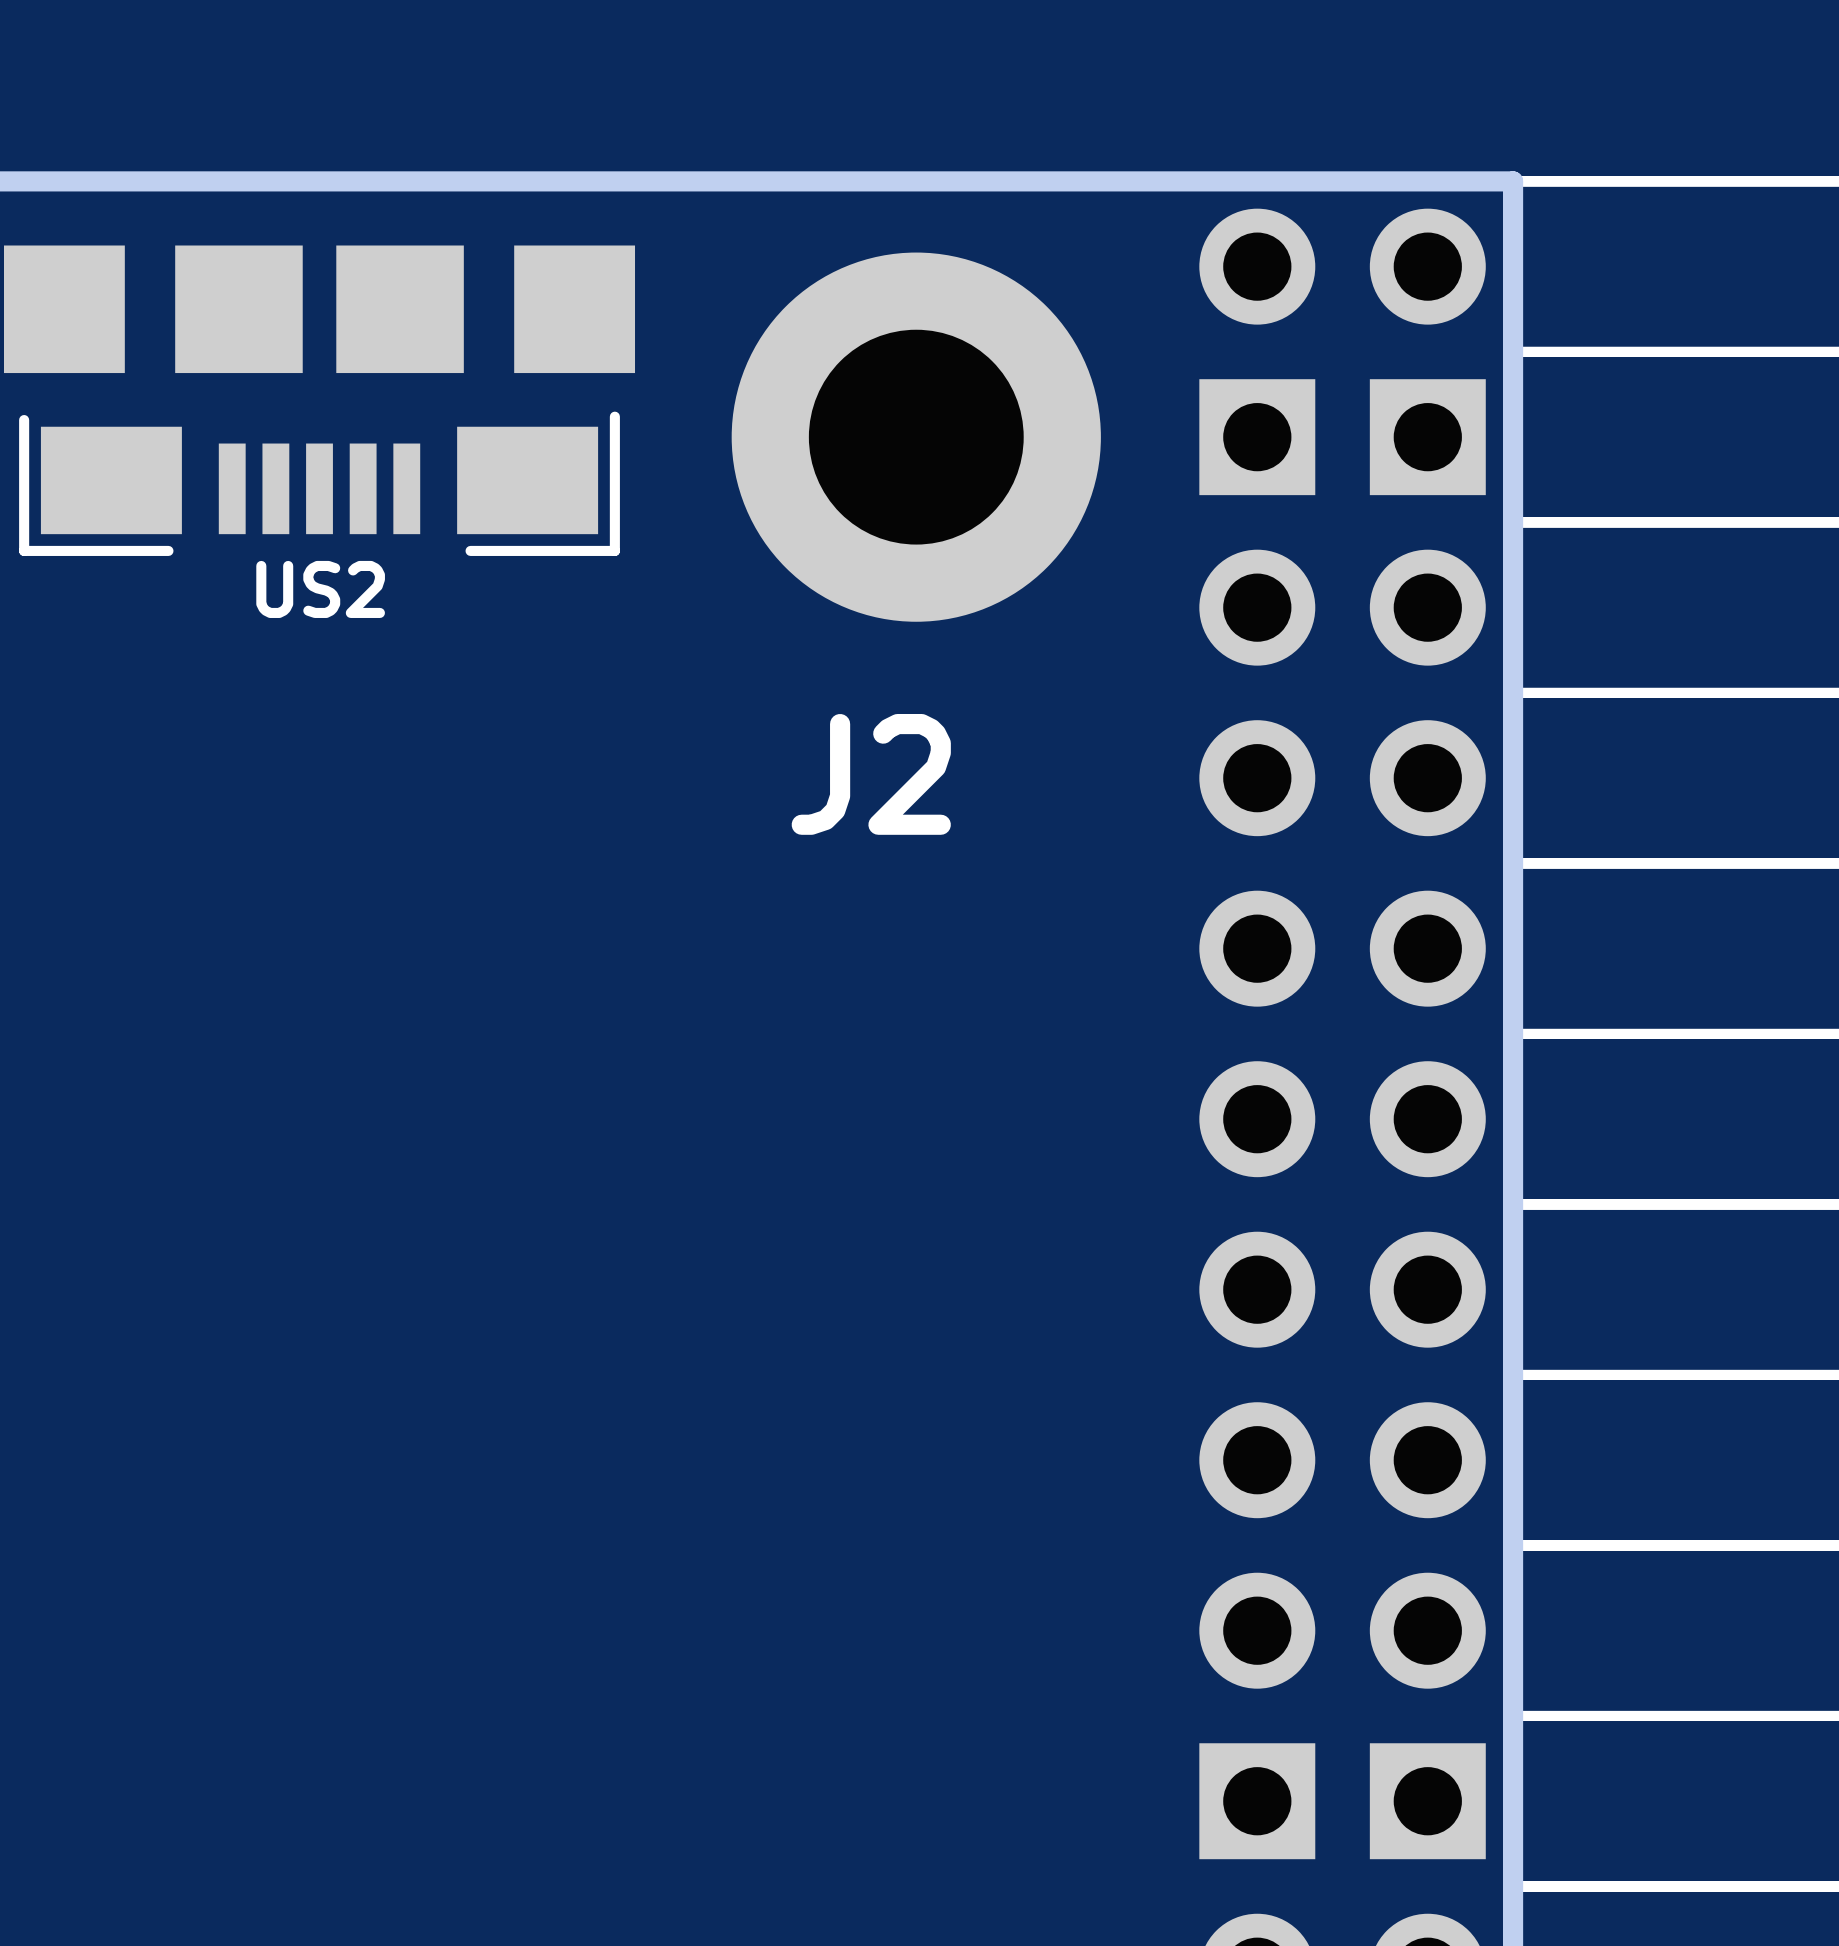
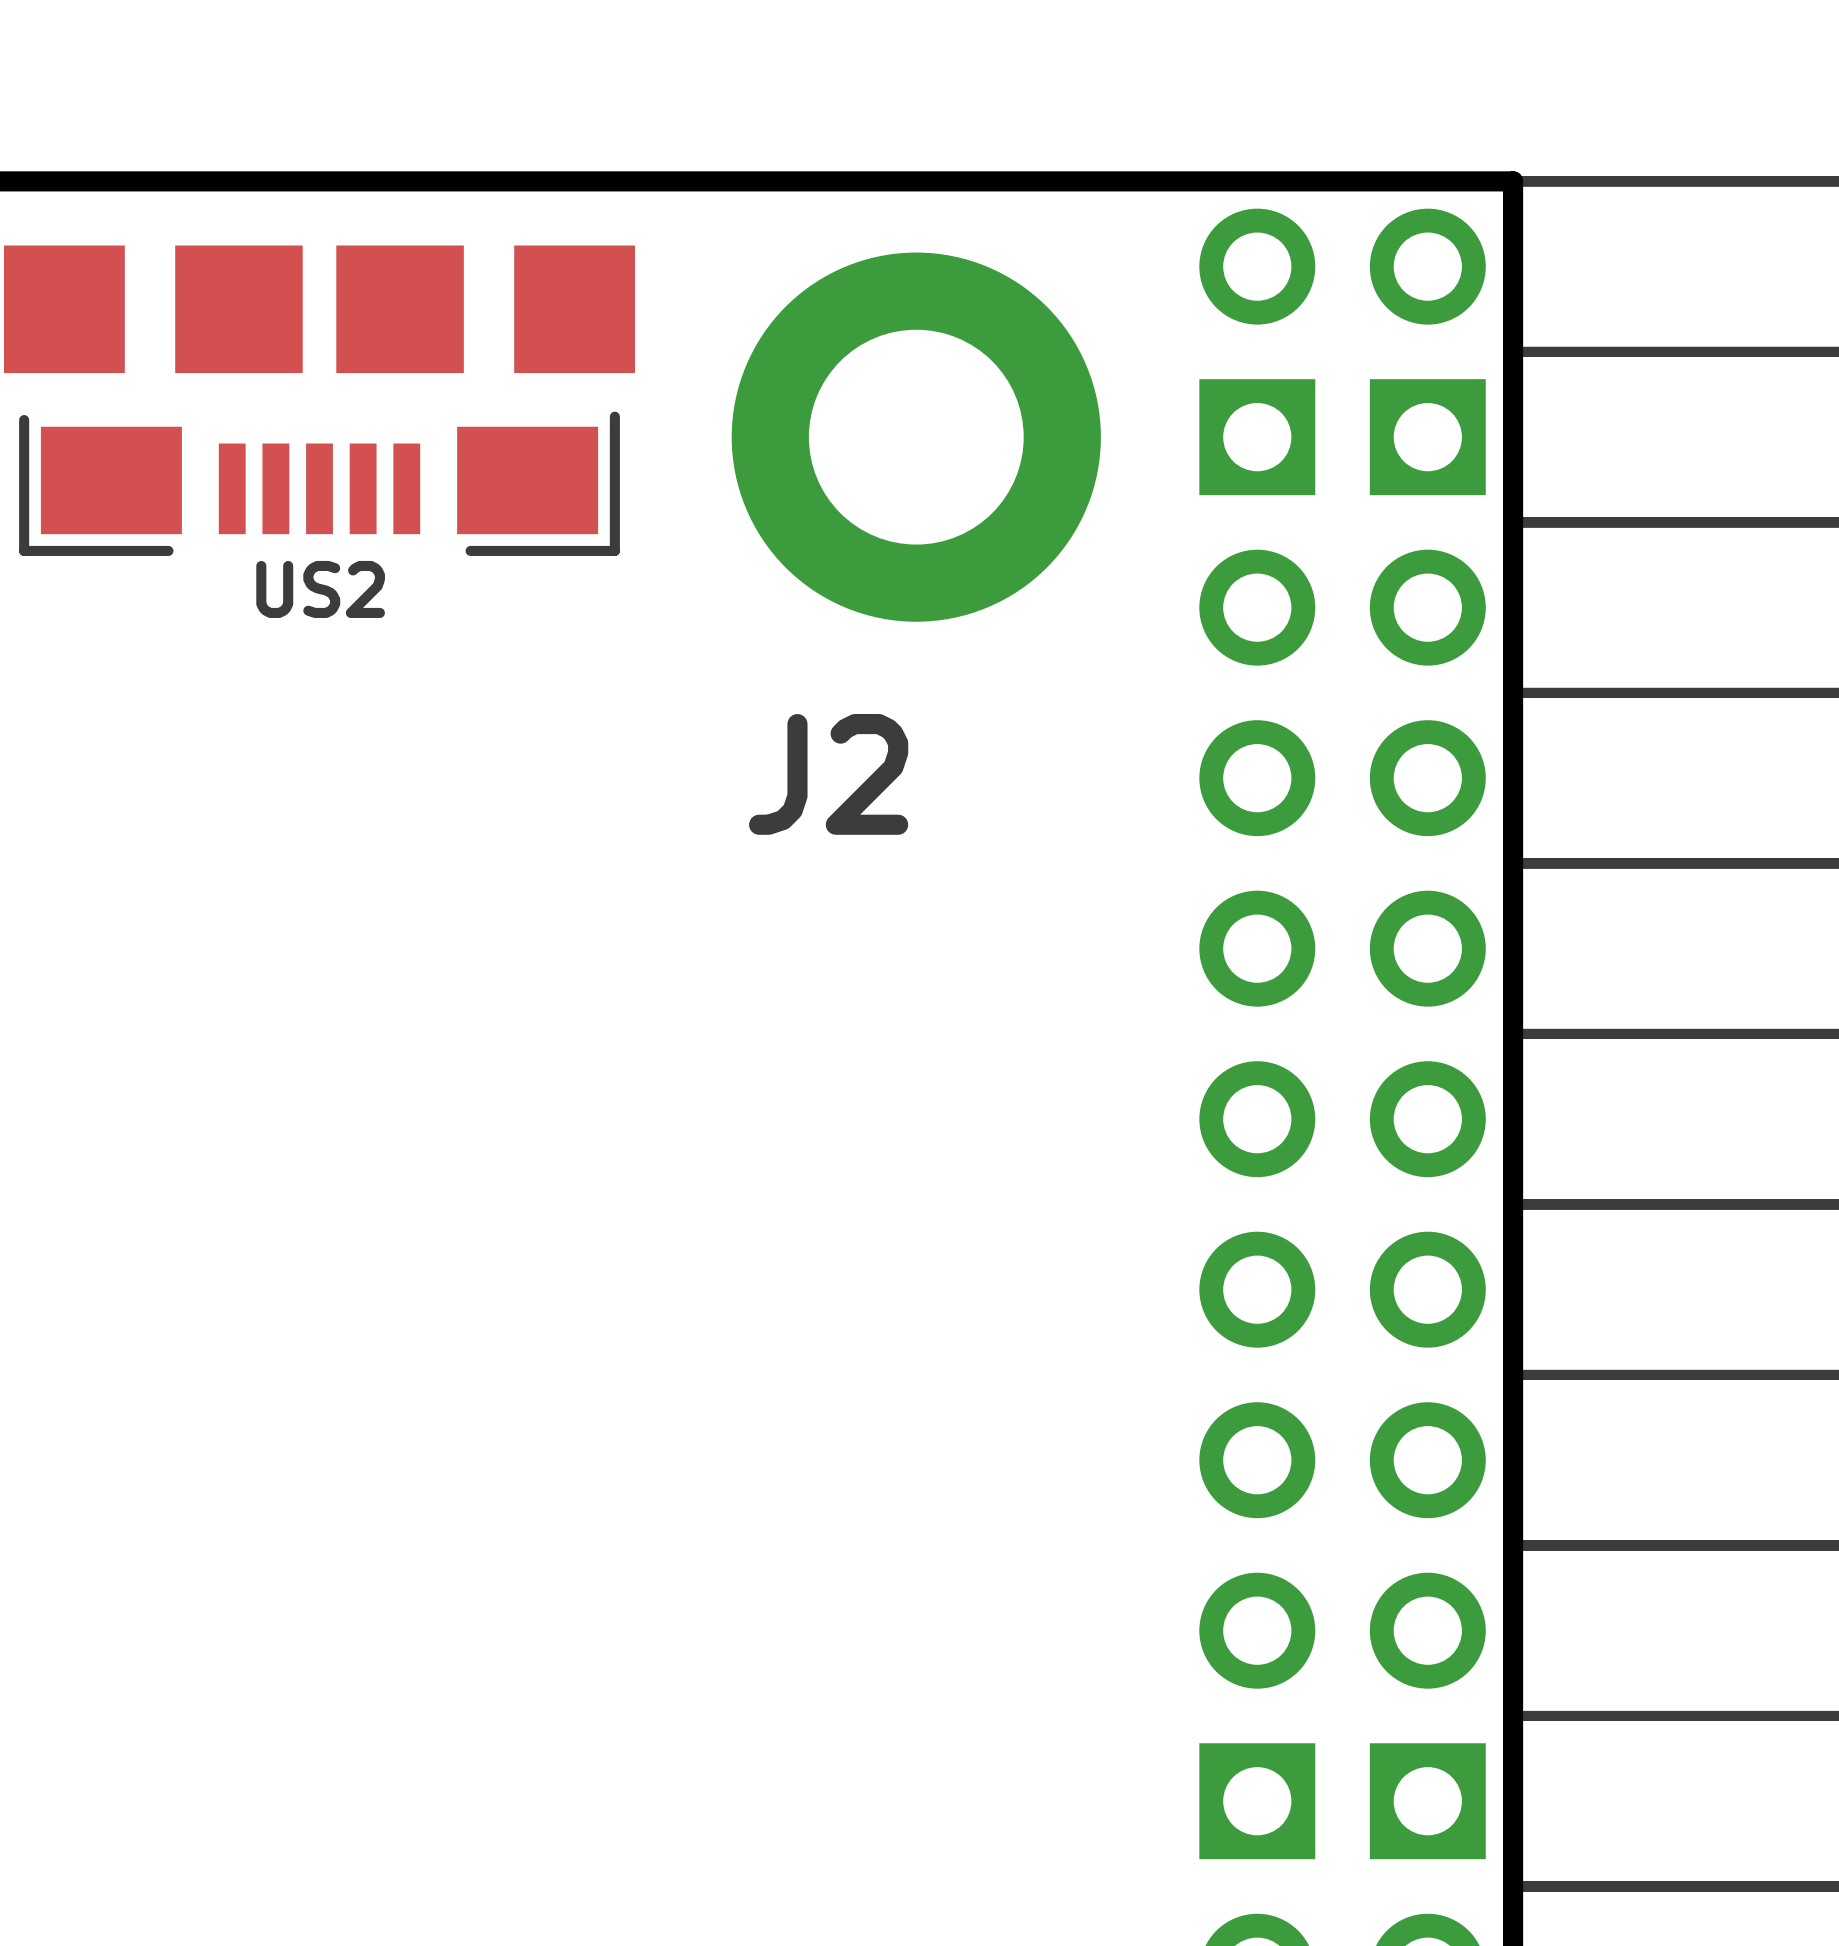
J2 name position: J2 (871, 774) -> J2 (828, 774)

